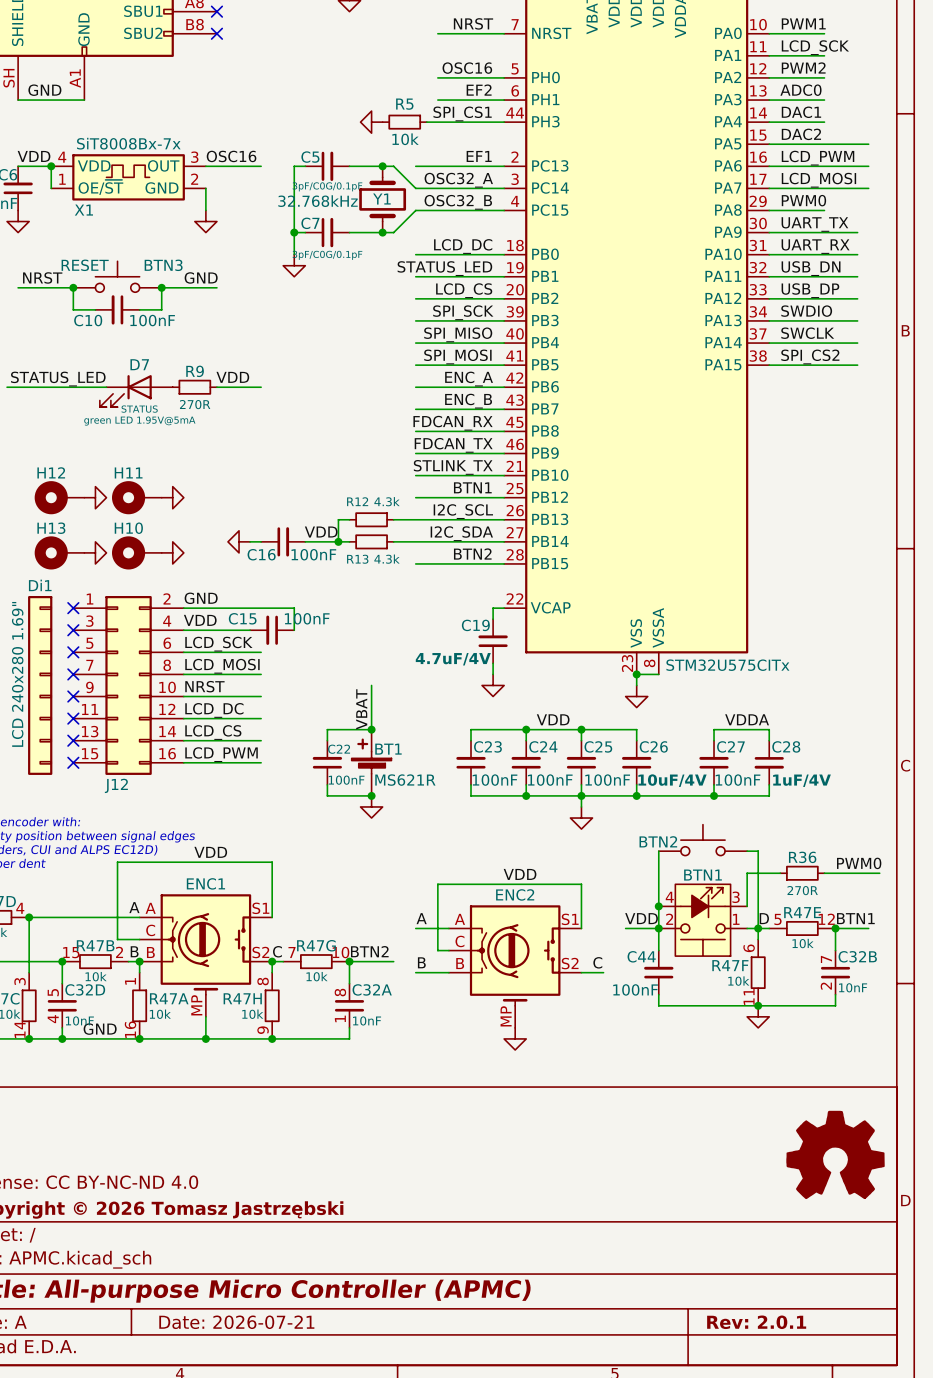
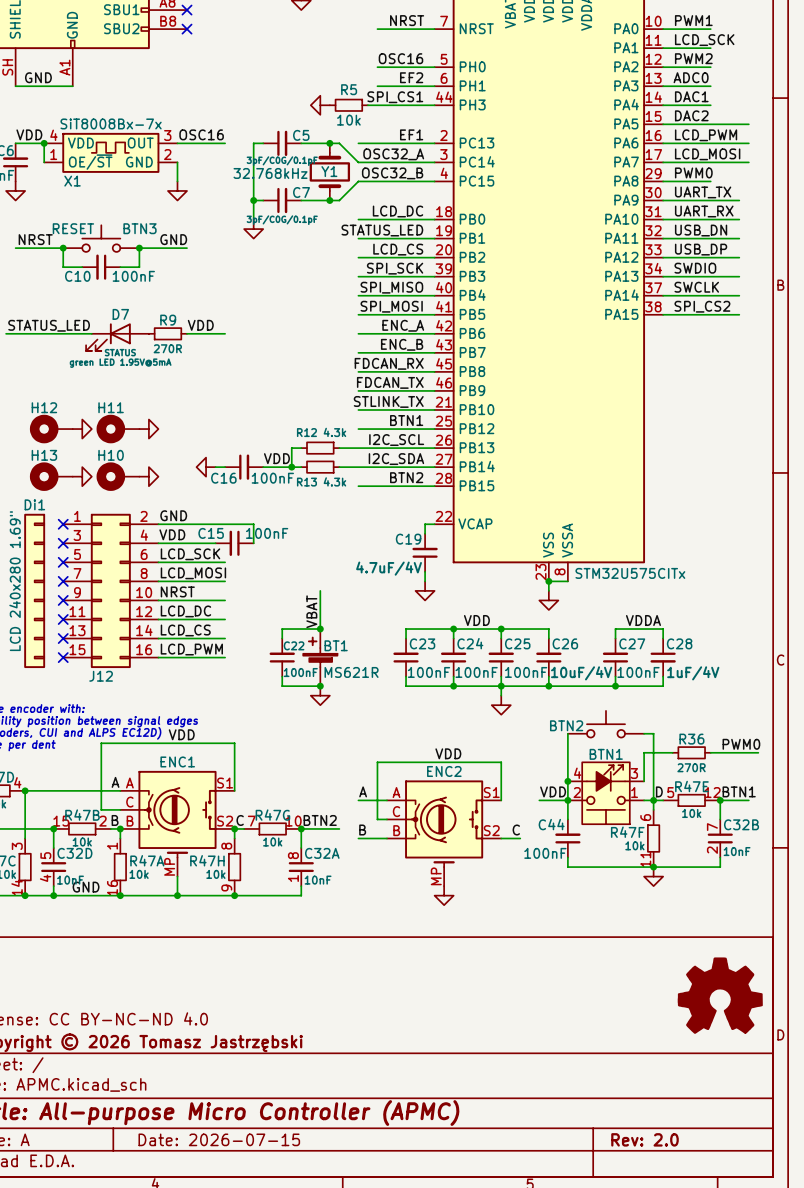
C5 name position: C5 (310, 157) -> C5 (301, 135)
C7 name position: C7 (310, 223) -> C7 (301, 192)
title block: Date: 2026-07-21 (236, 1322) -> Date: 2026-07-15 (219, 1139)
title block: Rev: 2.0.1 (756, 1322) -> Rev: 2.0 (645, 1139)

